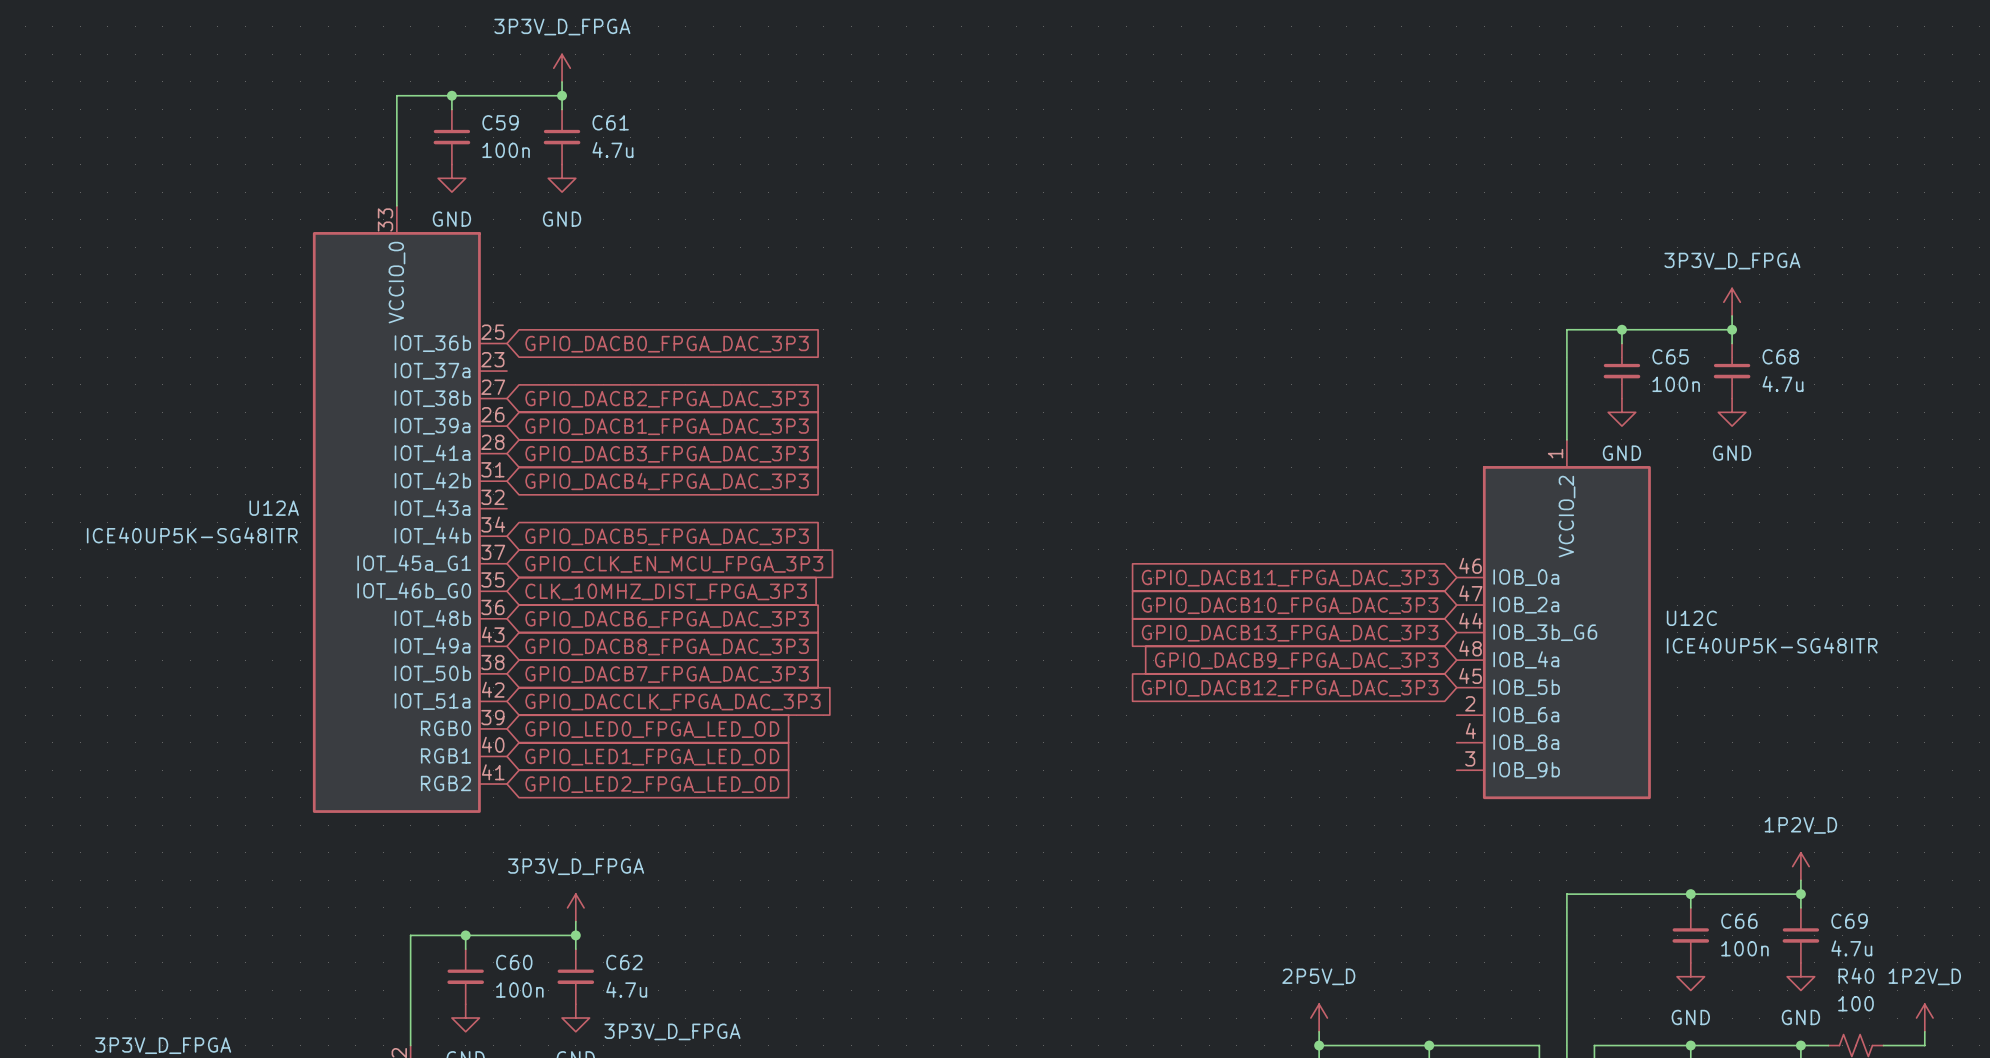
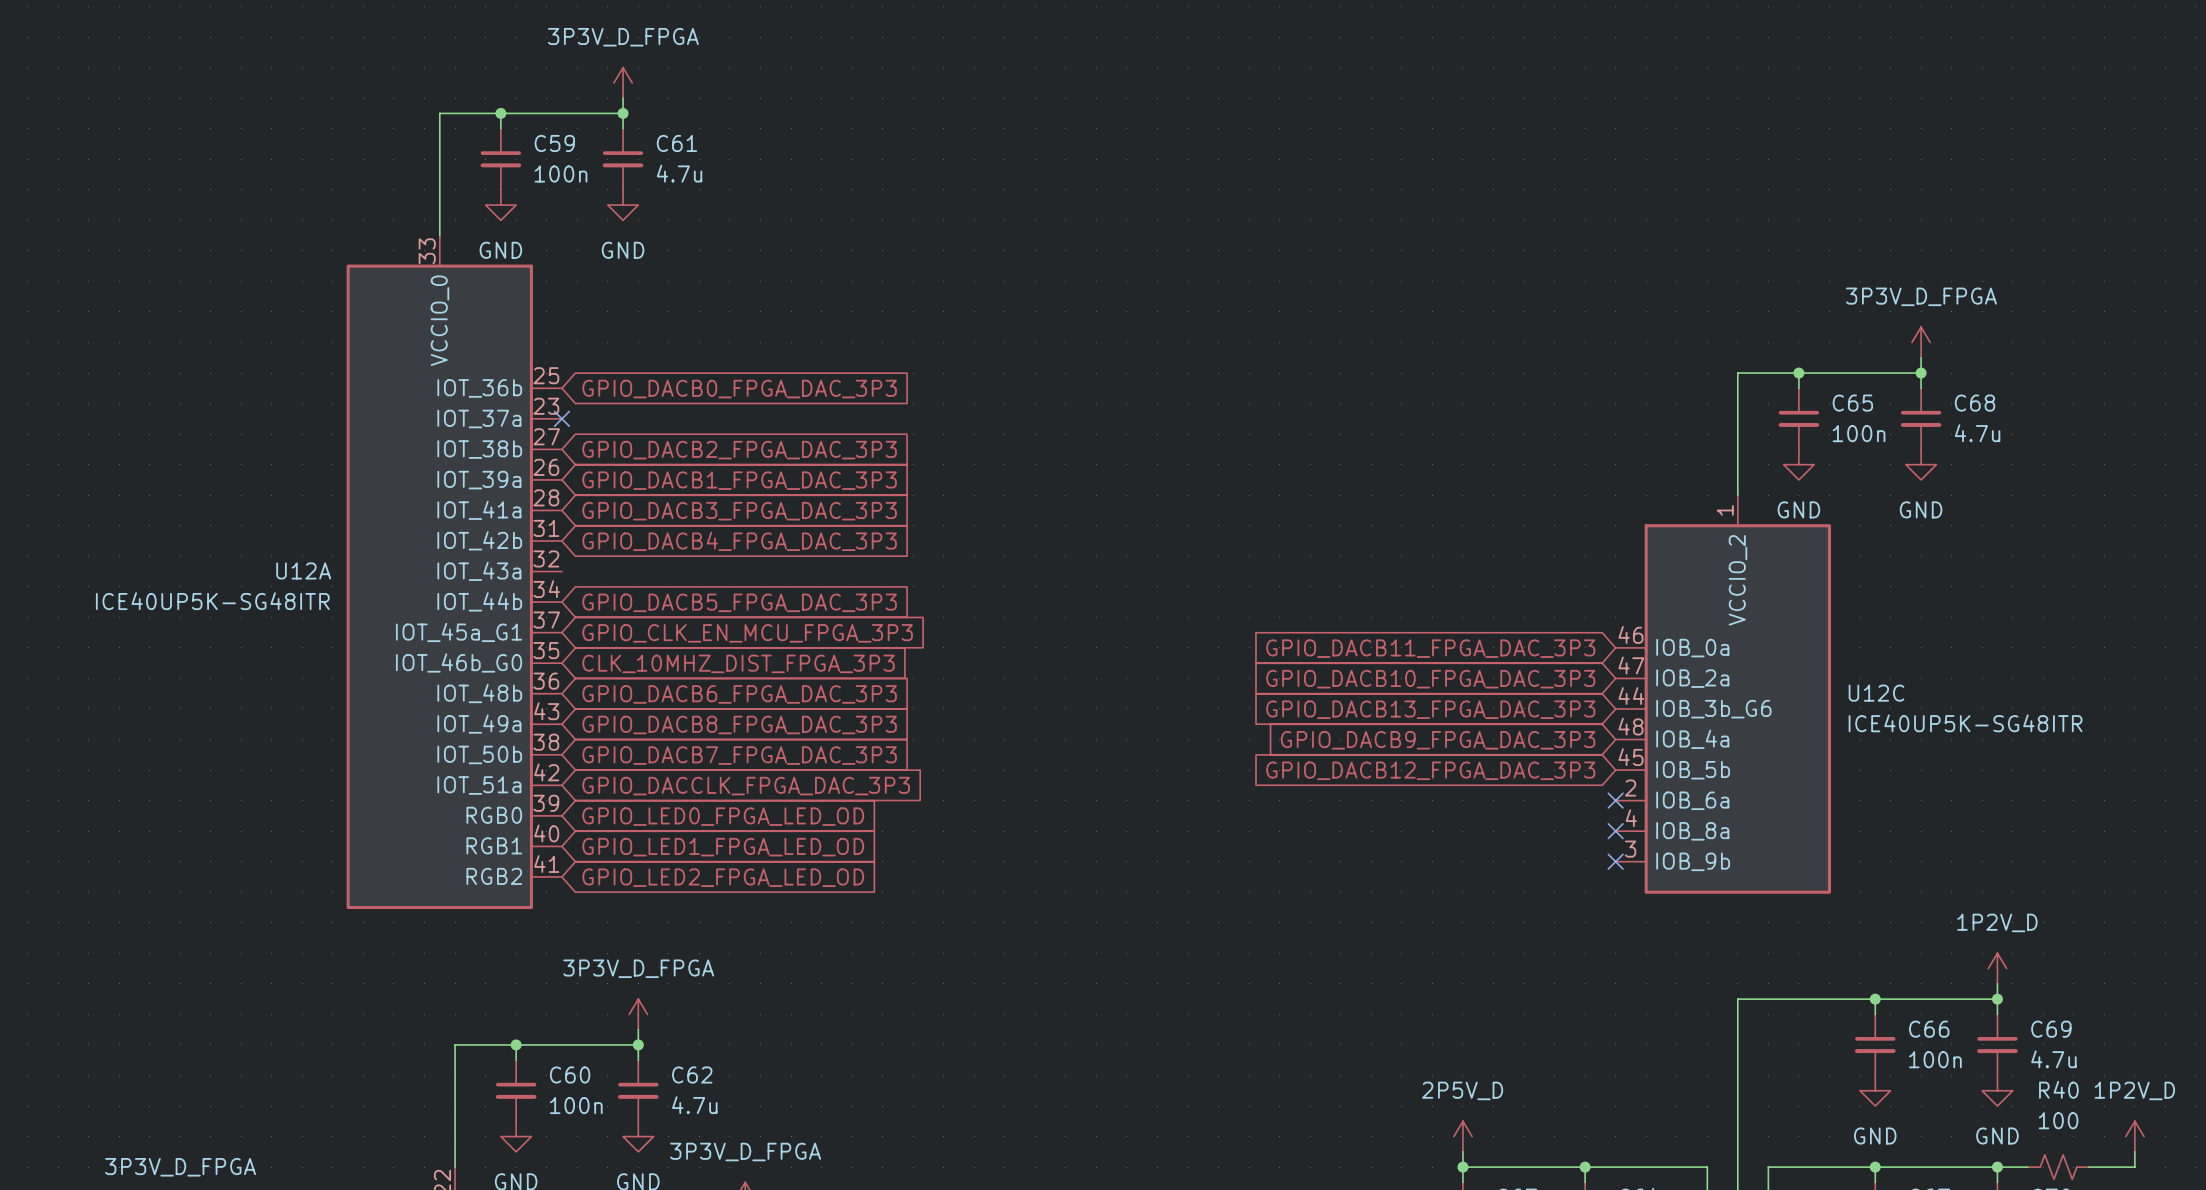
no-connect mark: none -> (561, 418)
no-connect mark: none -> (1615, 800)
no-connect mark: none -> (1615, 831)
no-connect mark: none -> (1615, 861)

